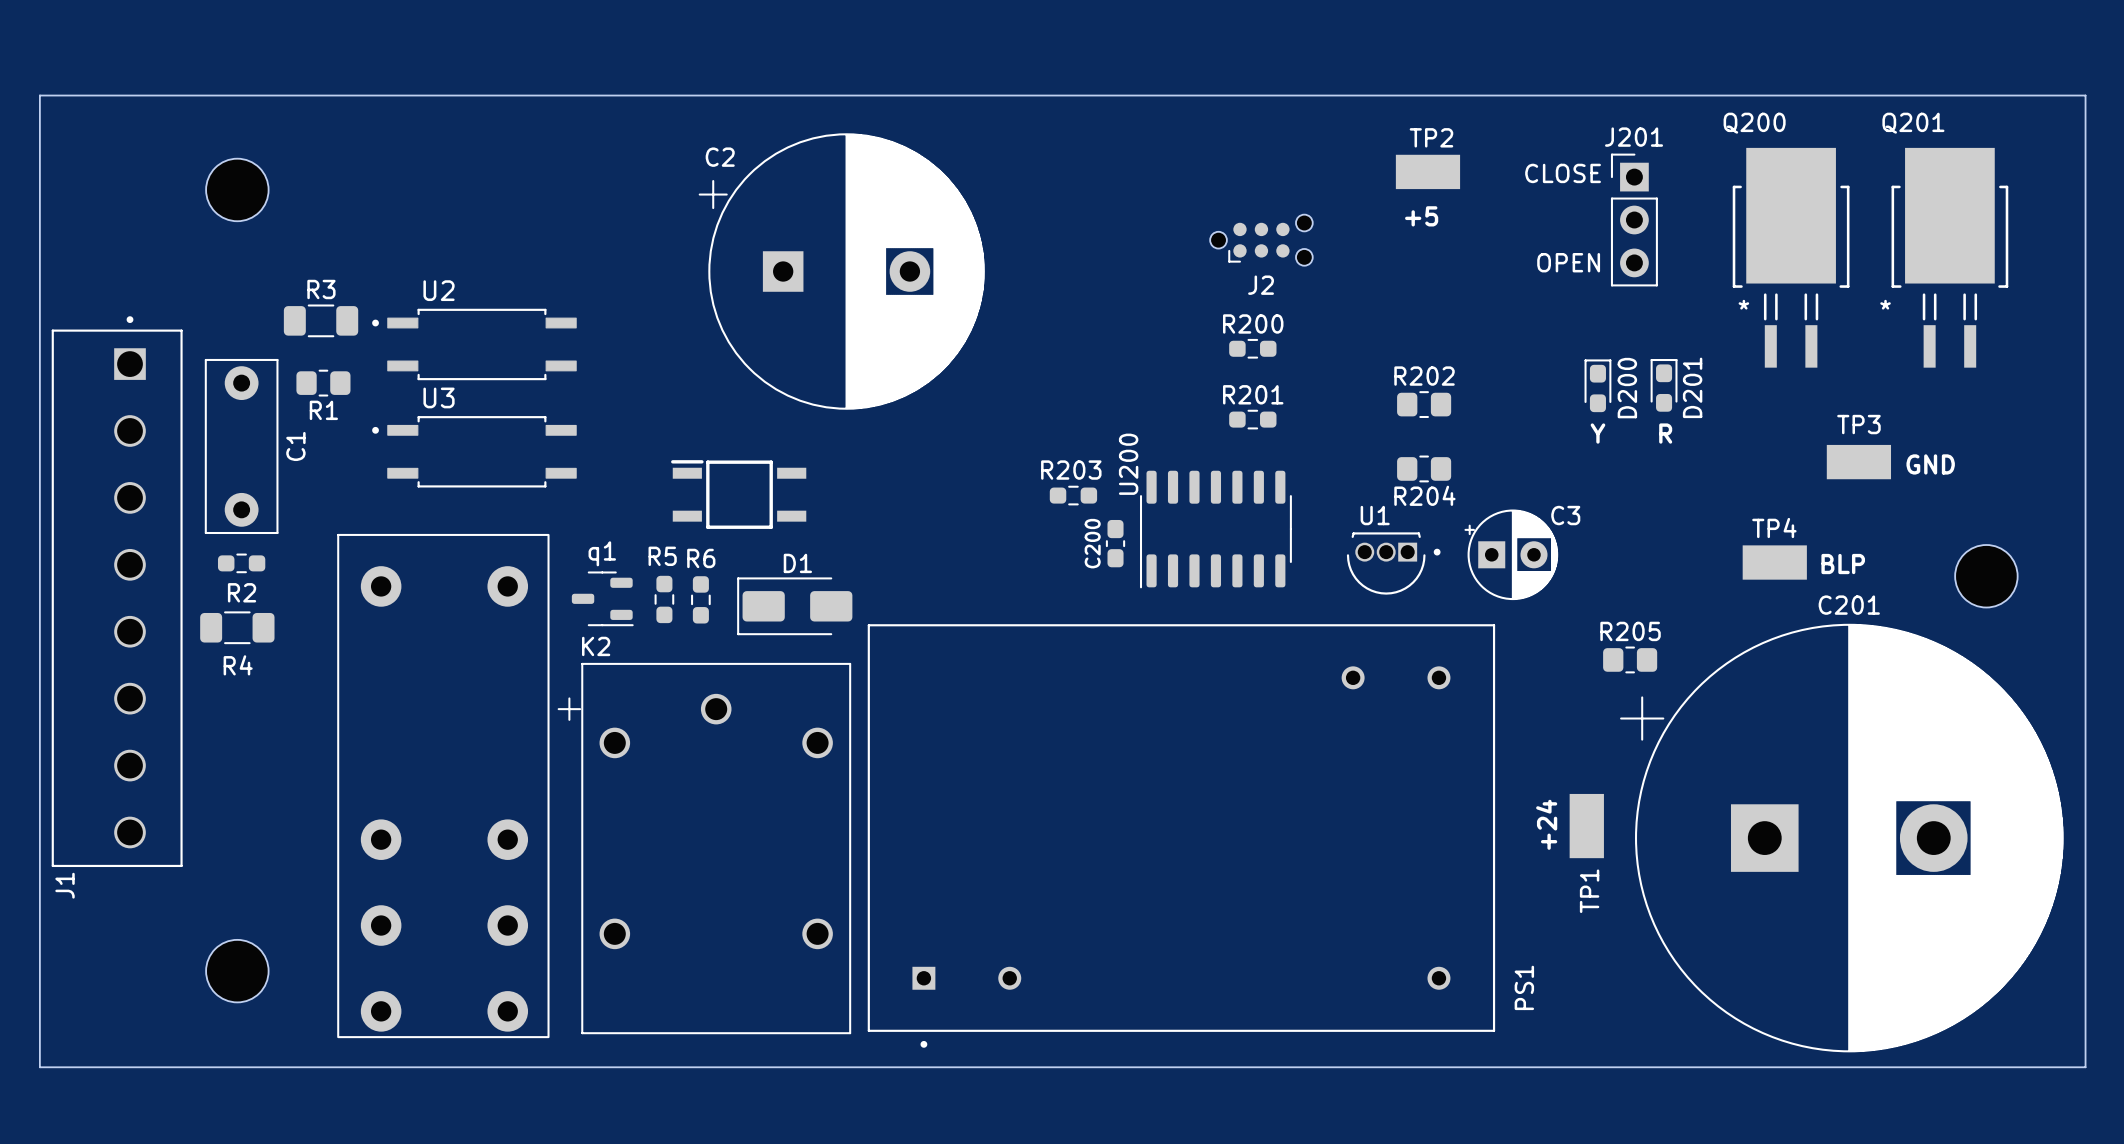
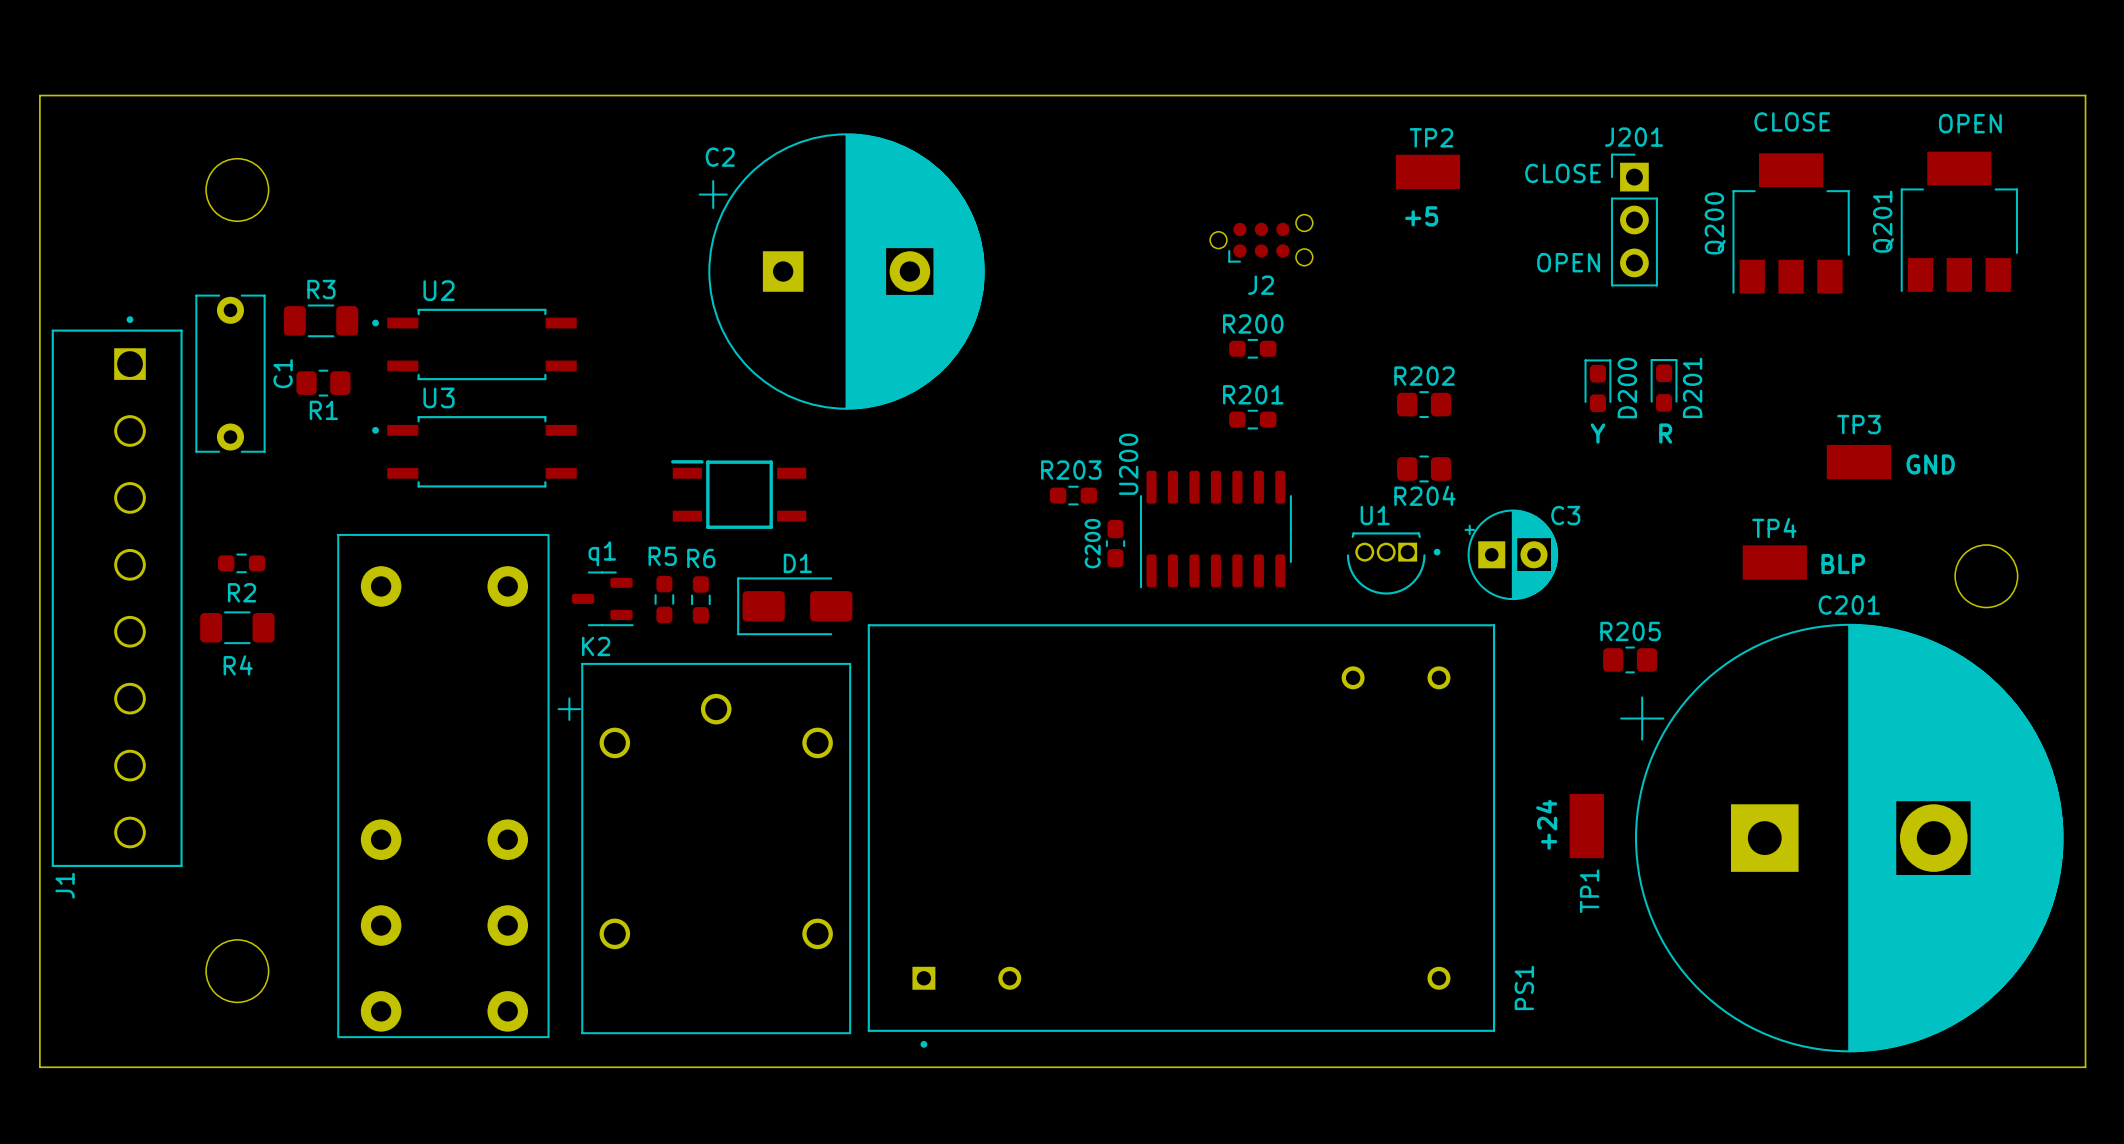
text: none -> CLOSE (1792, 121)
Q200 name position: Q200 (1754, 123) -> Q200 (1715, 223)
Q201 name position: Q201 (1913, 123) -> Q201 (1883, 221)
text: none -> OPEN (1970, 123)
Q200 footprint: [1732, 147, 1850, 368] -> [1732, 153, 1850, 294]
Q201 footprint: [1891, 147, 2009, 368] -> [1900, 151, 2018, 293]
C1 footprint: [204, 358, 279, 535] -> [195, 294, 266, 453]

